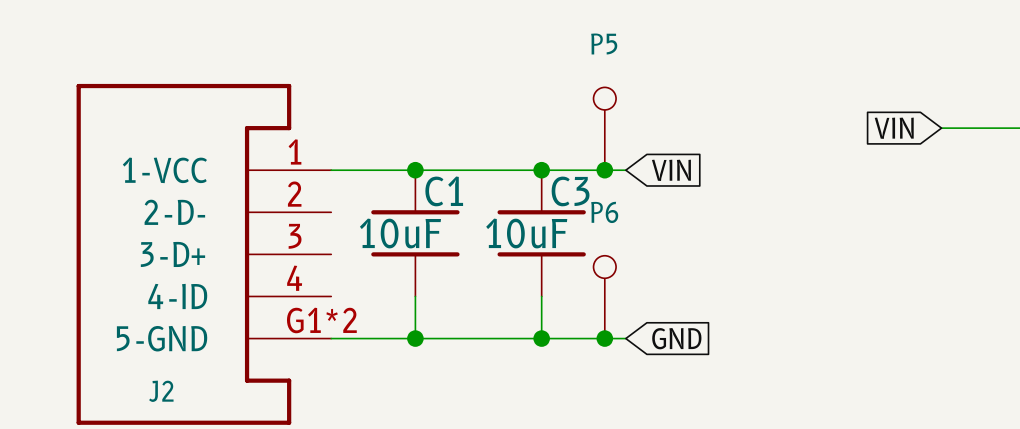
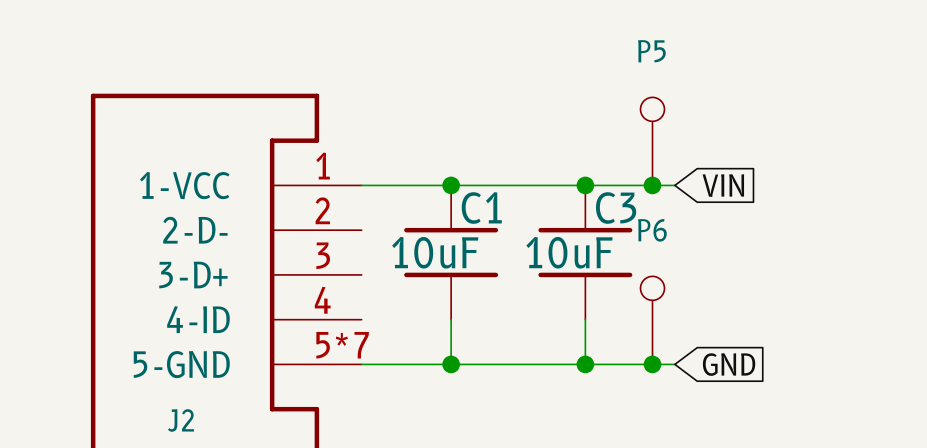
J2 pin number: G1*2 (321, 320) -> 5*7 (342, 345)

